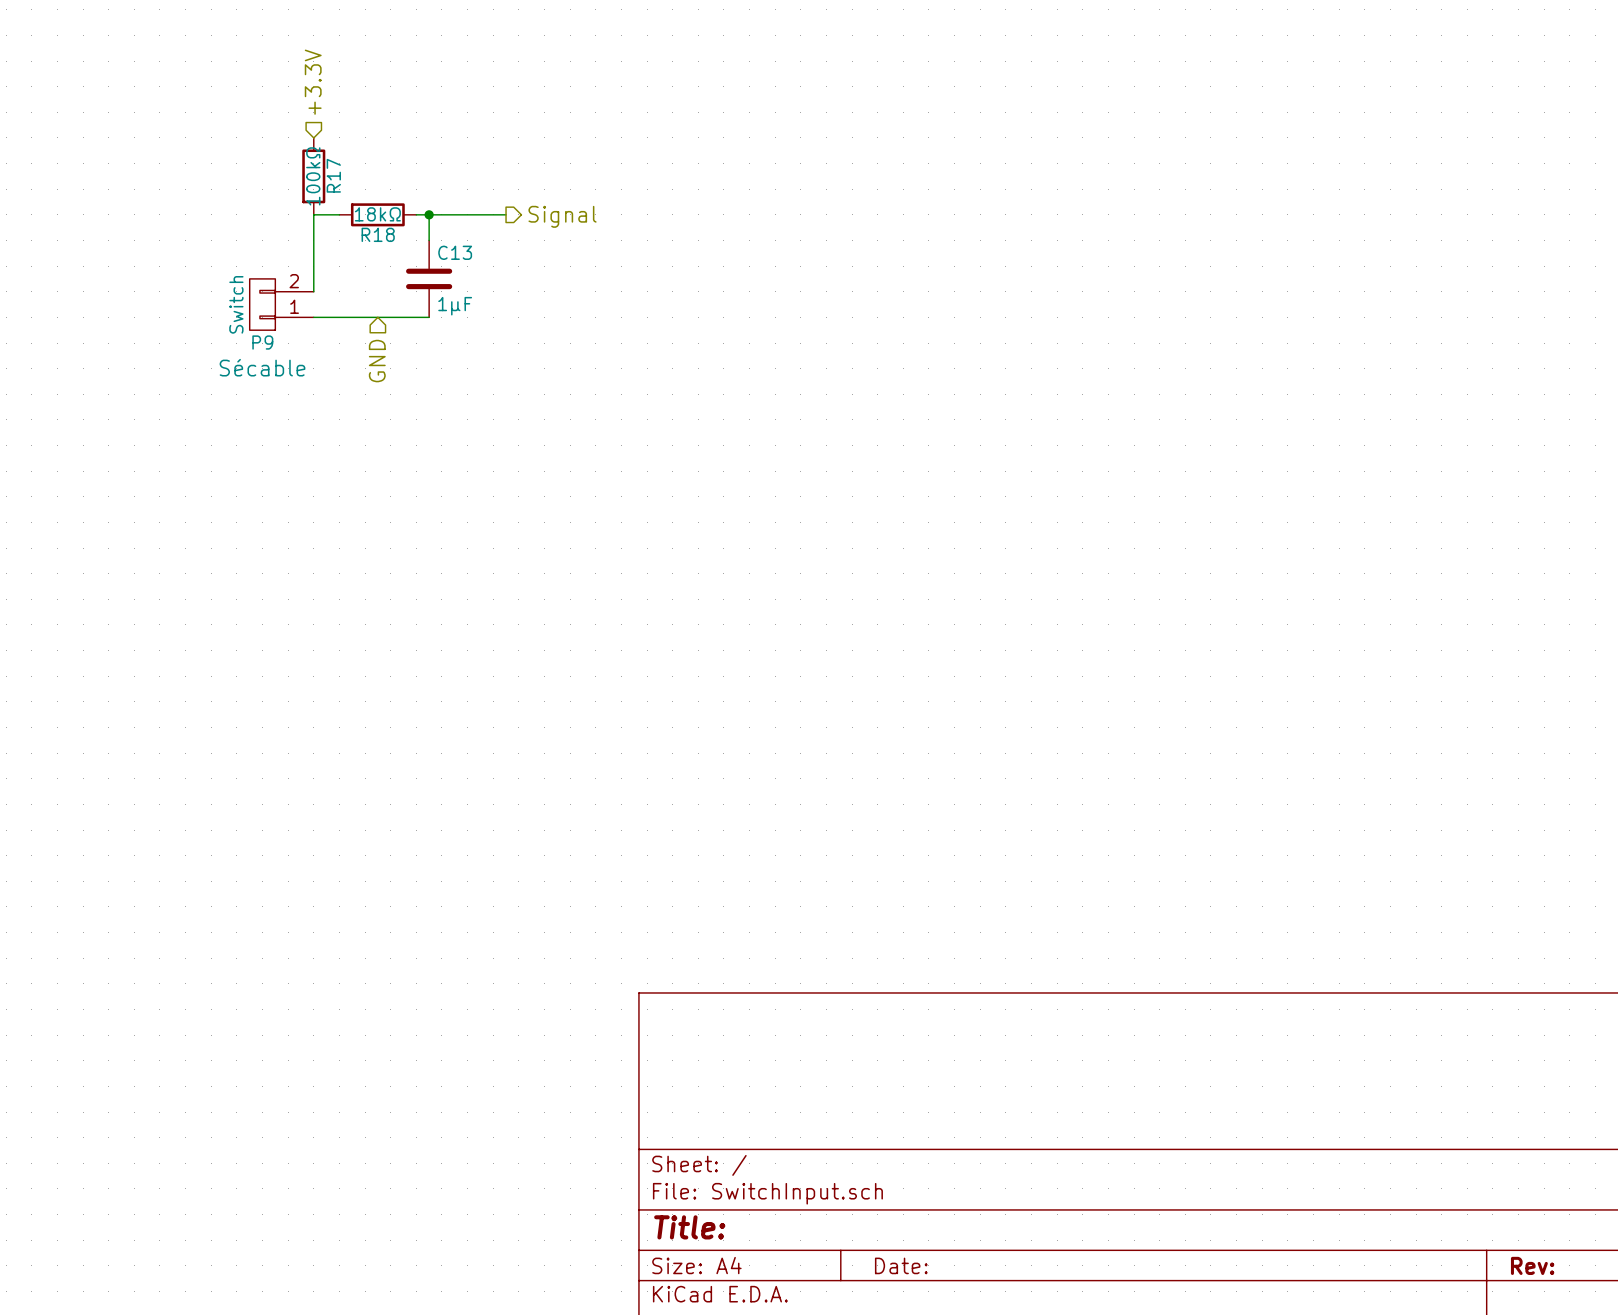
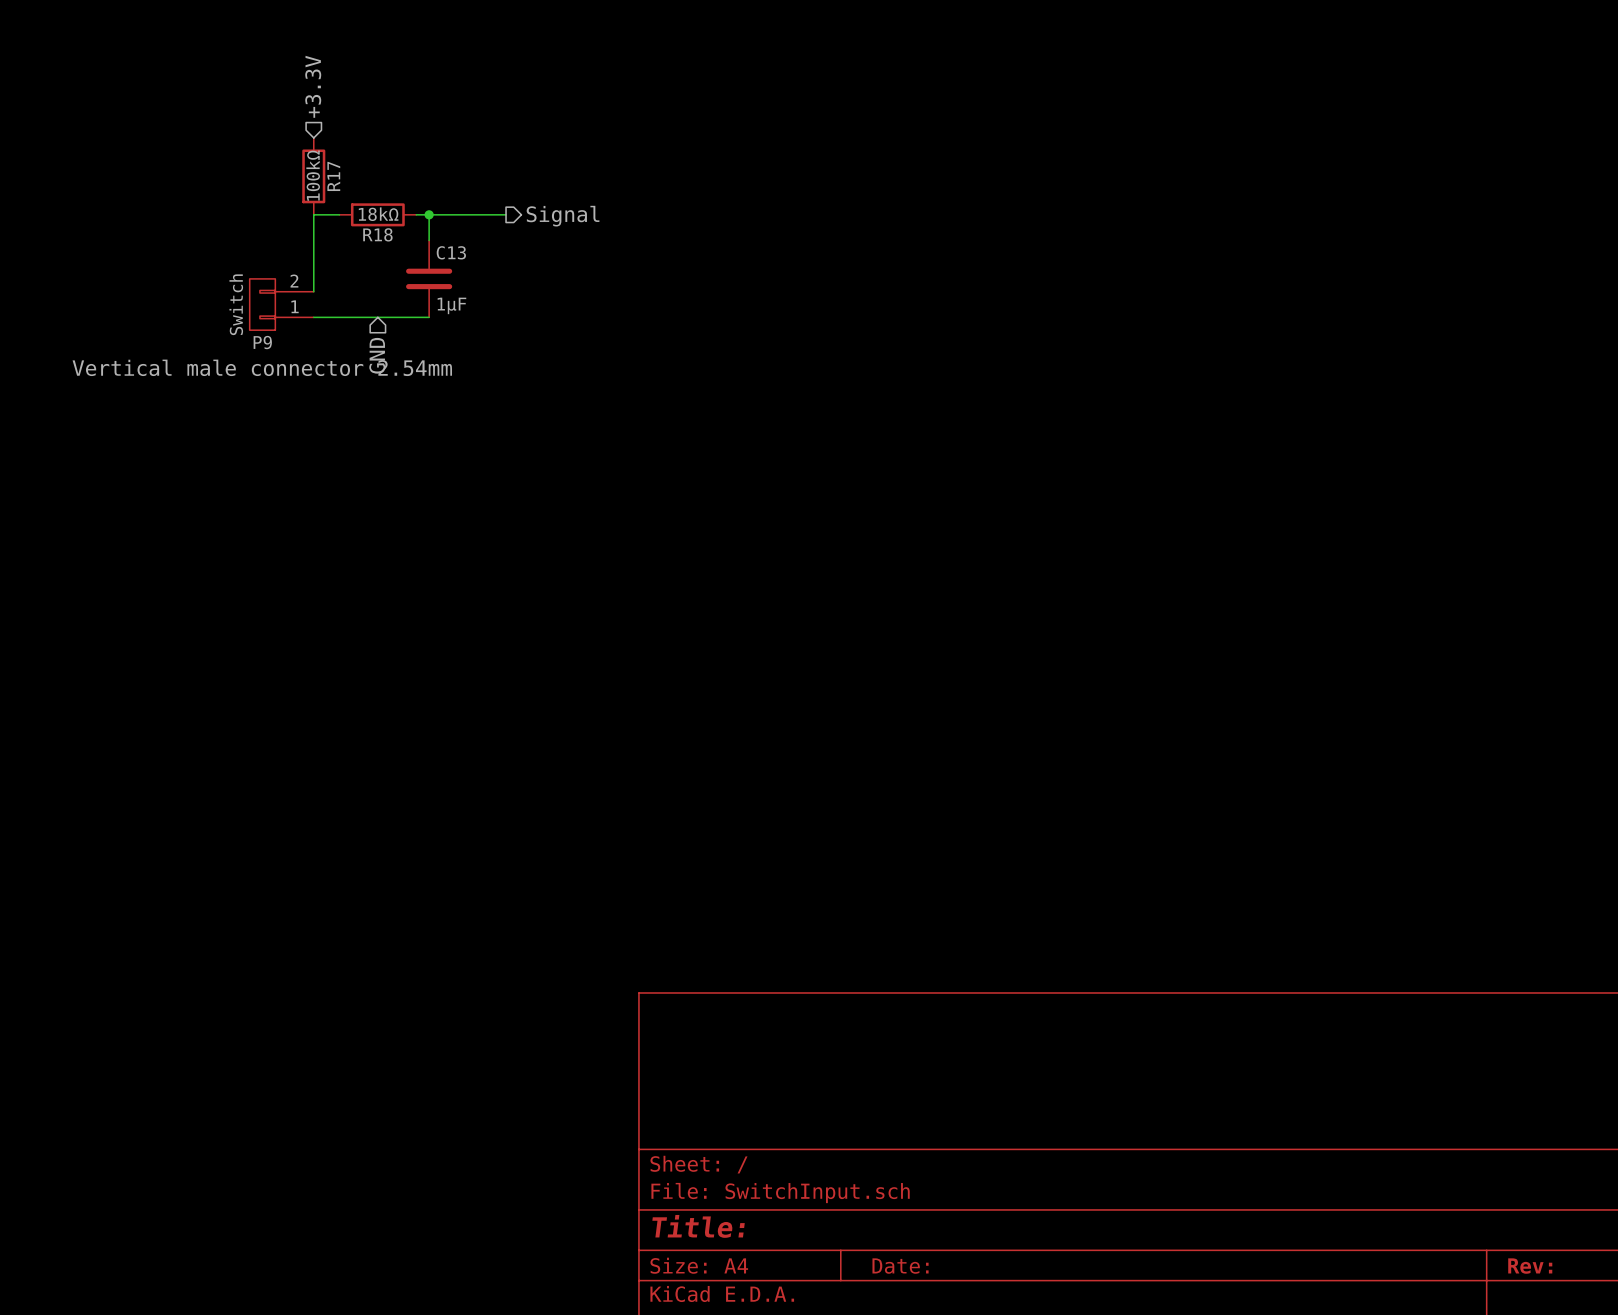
P9 text: Sécable (262, 367) -> Vertical male connector 2.54mm (262, 367)

